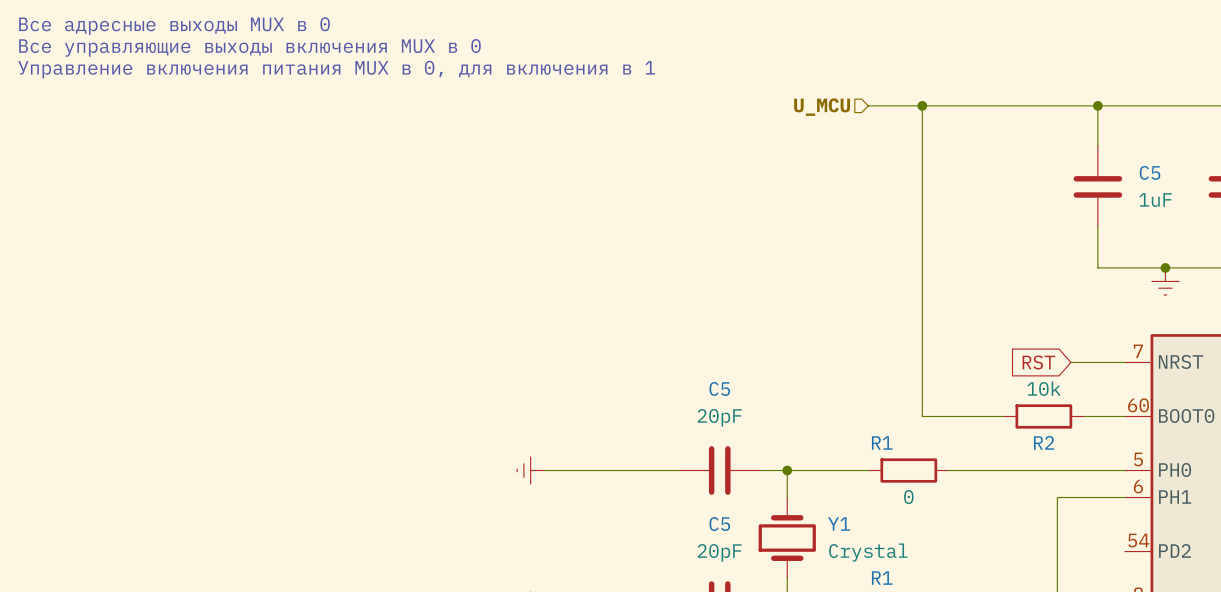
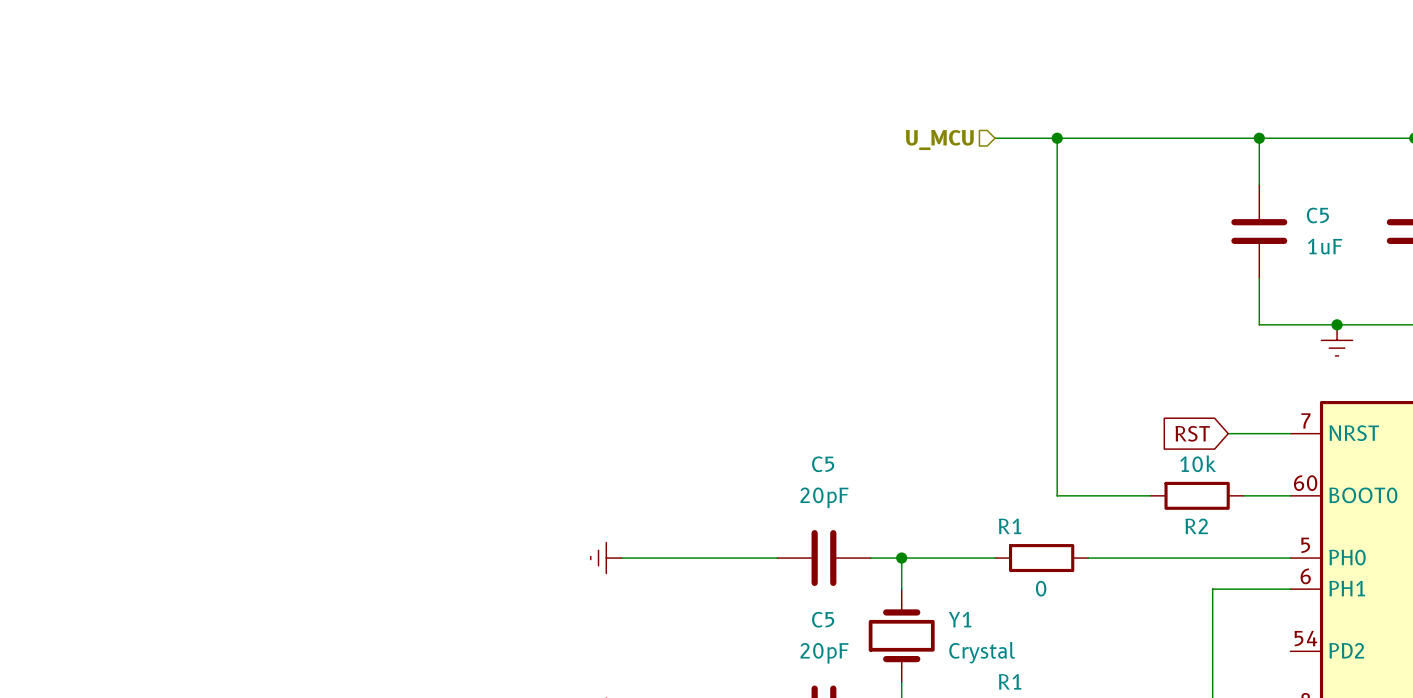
text: Все адресные выходы MUX в 0 (174, 26) -> none
text: Все управляющие выходы включения MUX в 0 (249, 47) -> none
text: Управление включения питания MUX в 0, для включения в 1 (336, 69) -> none

